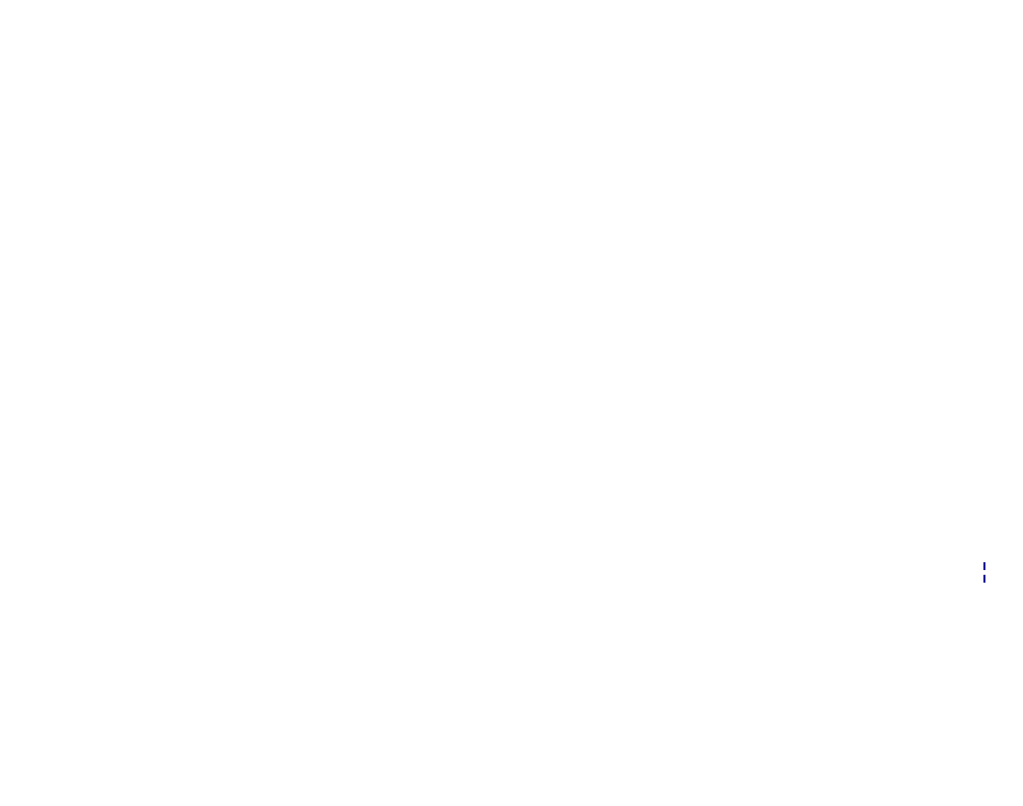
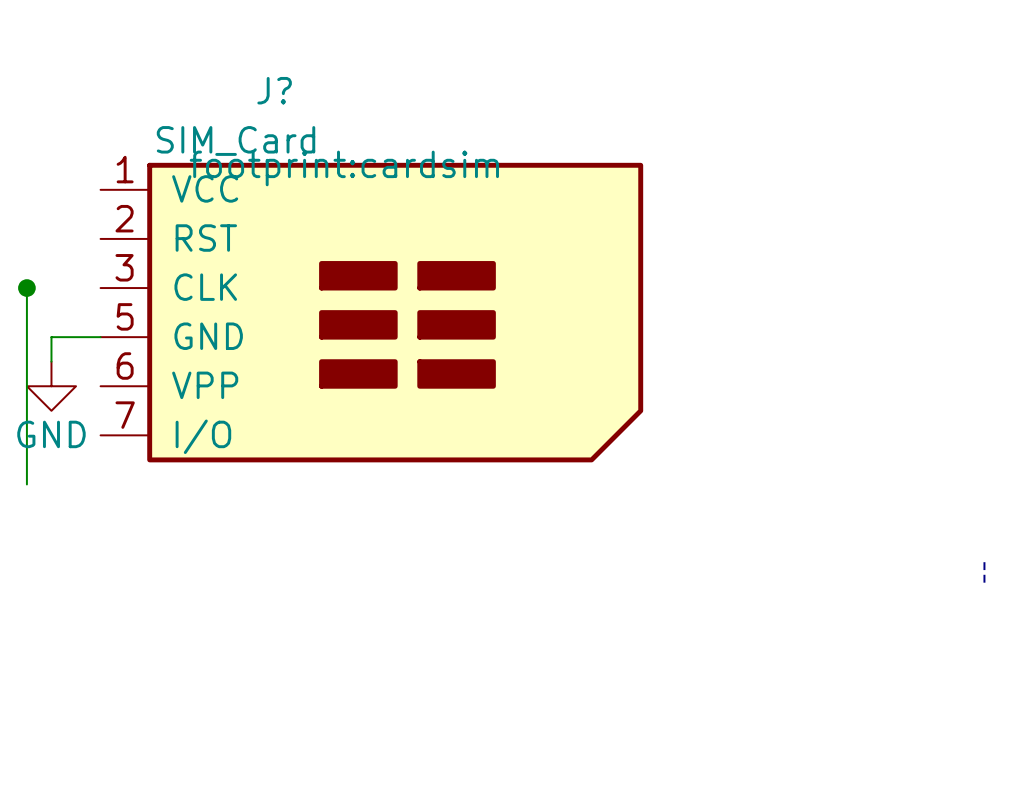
wire: none -> (26, 288) (26, 484)
junction: none -> (26, 288)
J?: none -> SIM_Card (371, 312)
wire: none -> (100, 337) (51, 337) (51, 361)
power symbol: none -> GND (51, 386)

